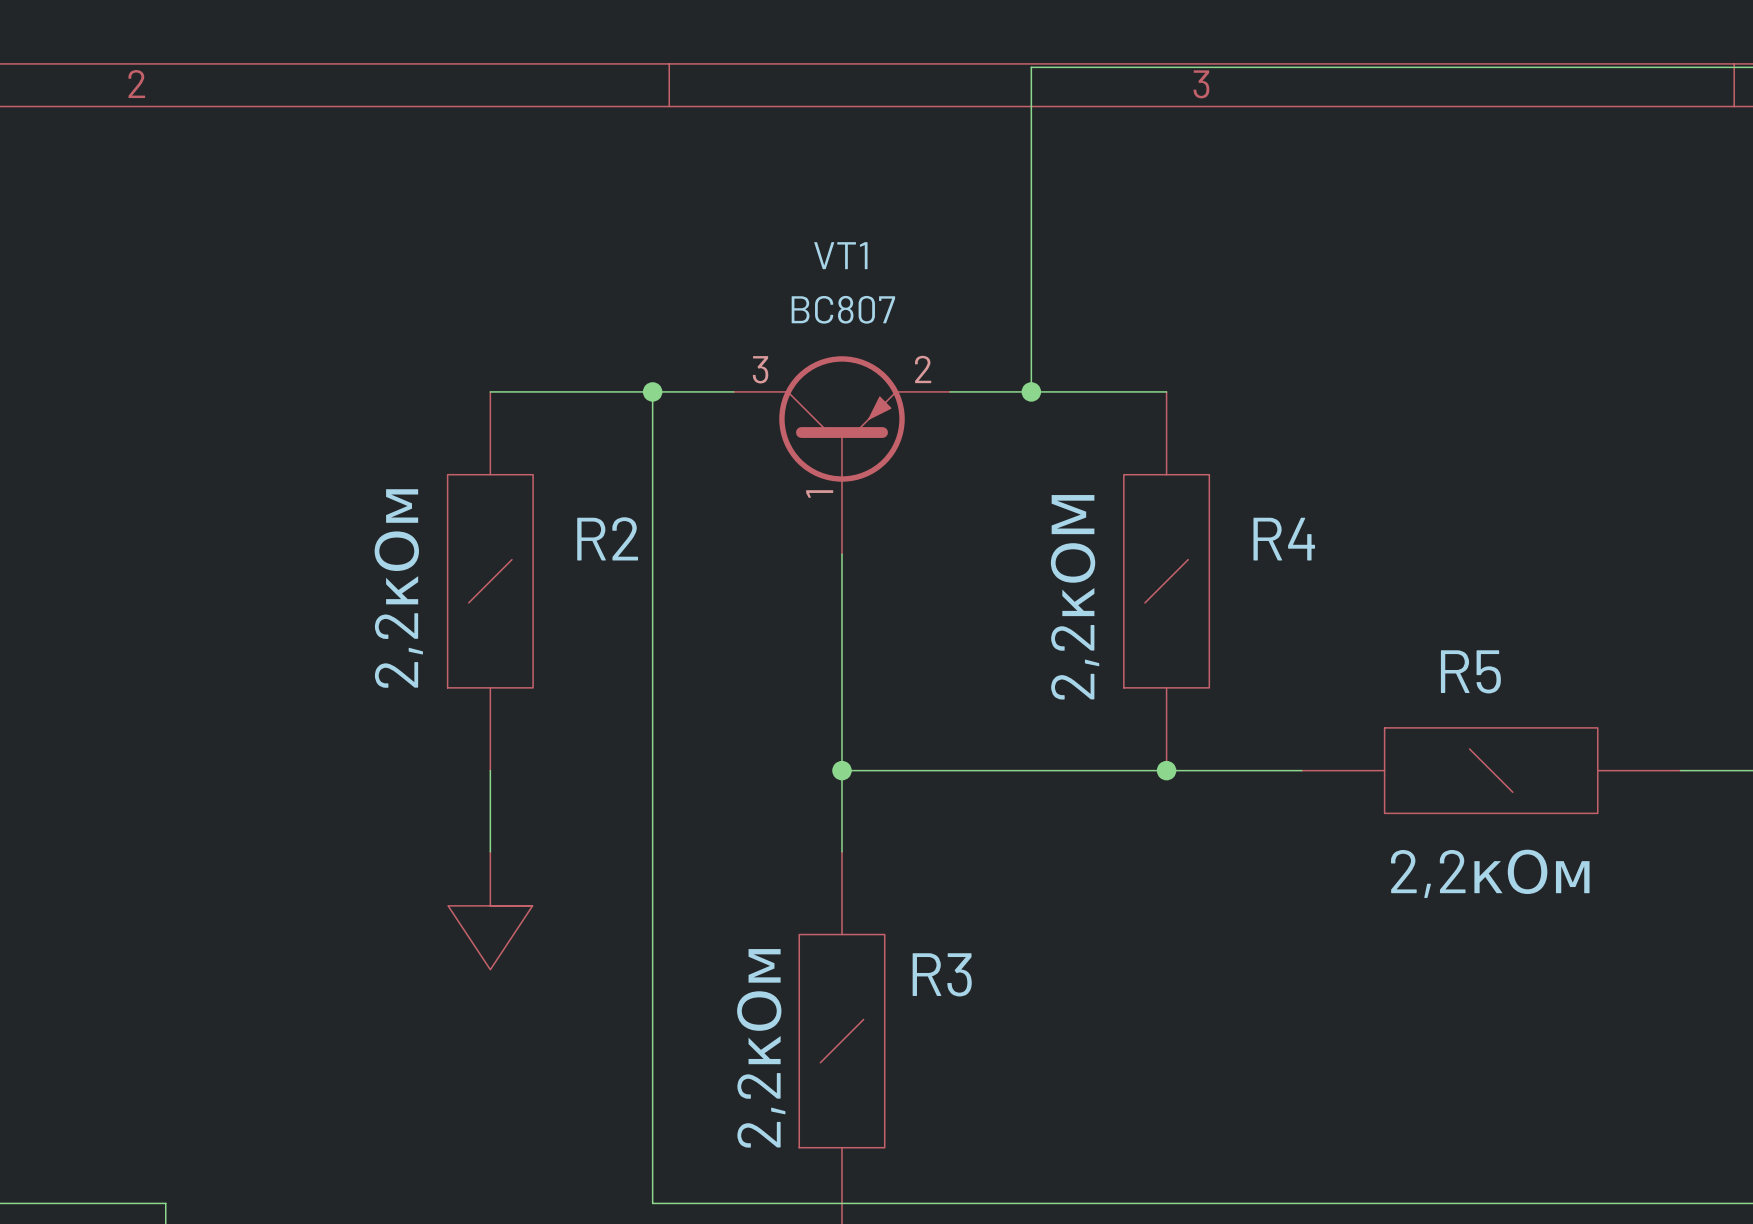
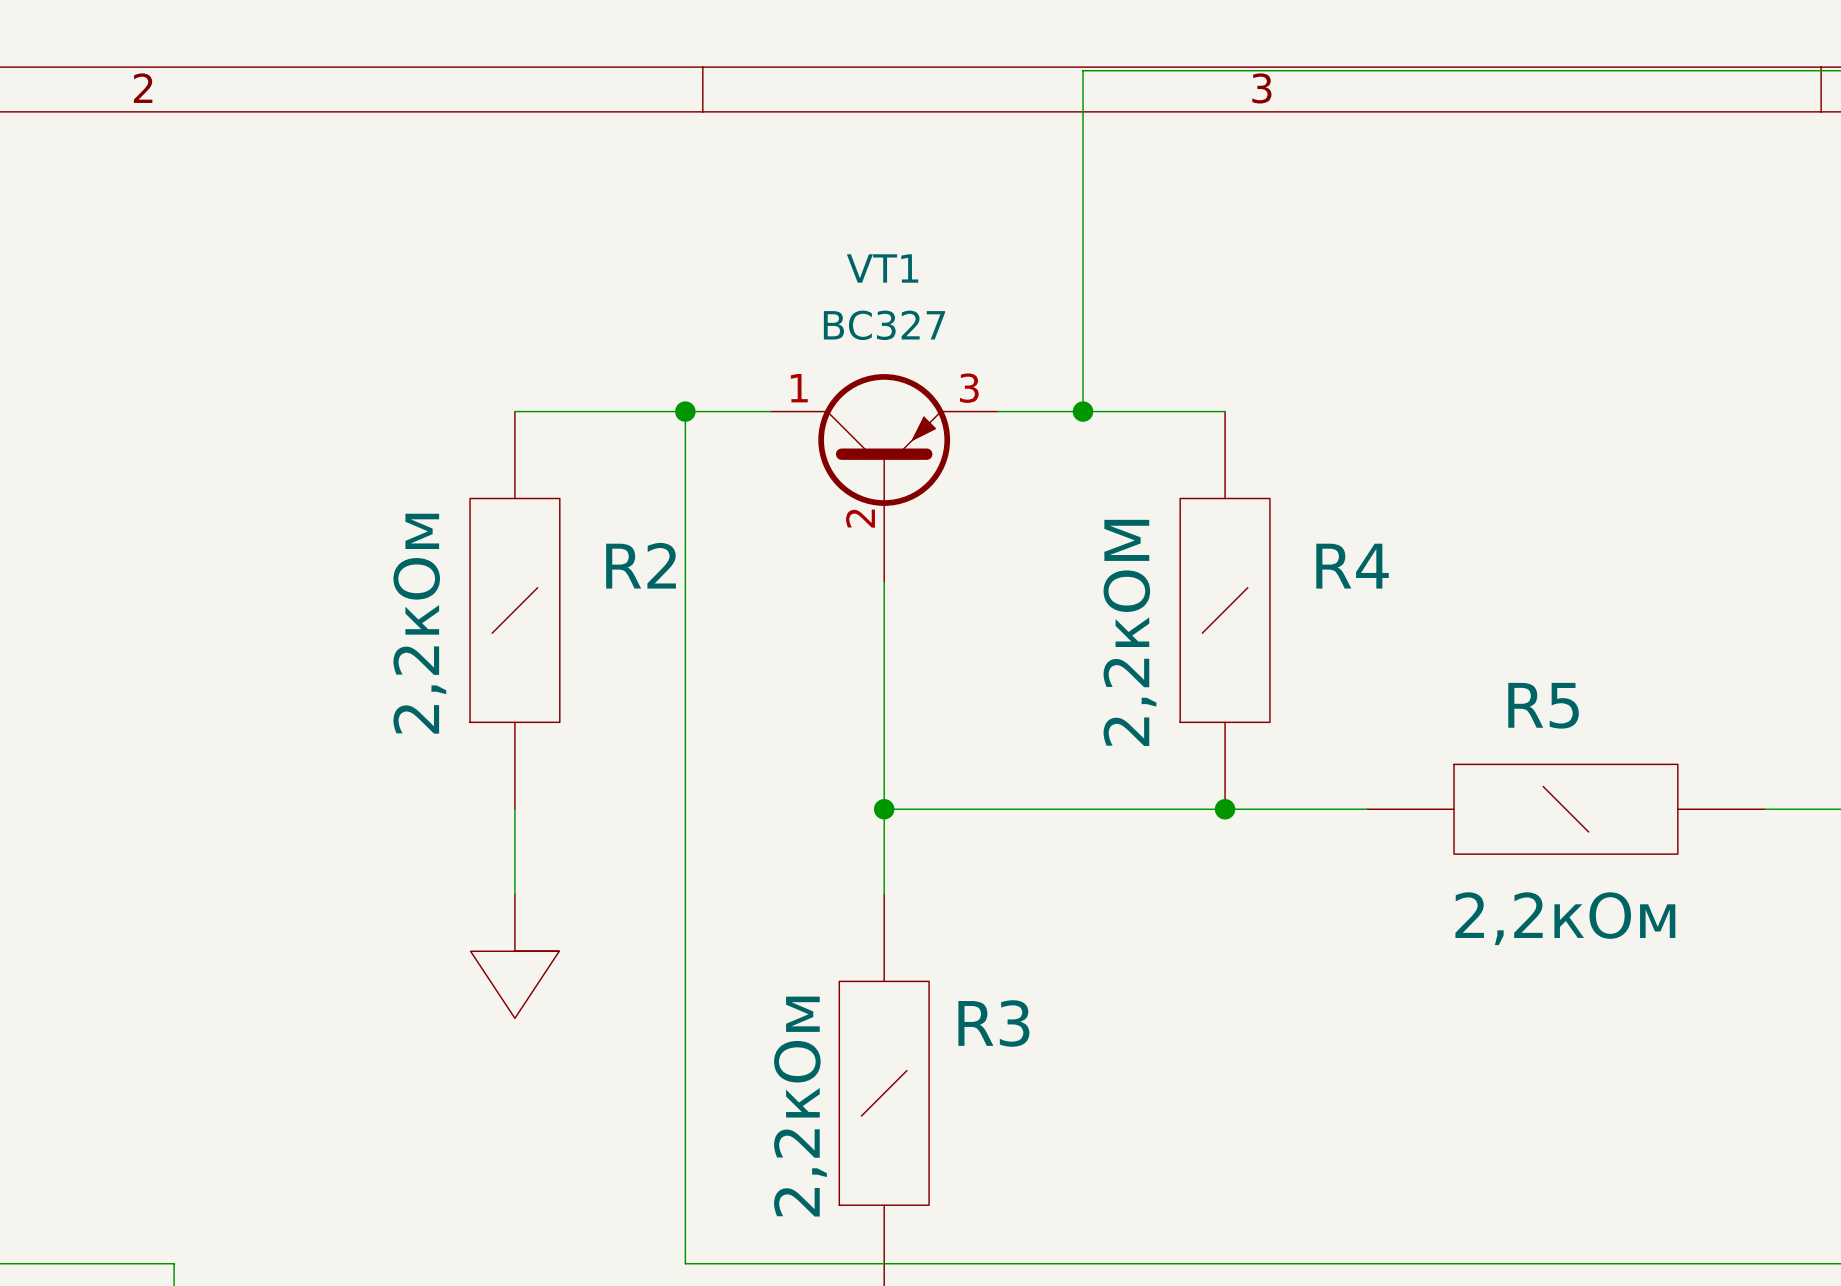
VT1 value: BC807 (843, 309) -> BC327 (884, 325)
VT1 pin number: 3 (760, 369) -> 1 (799, 388)
VT1 pin number: 2 (923, 369) -> 3 (969, 388)
VT1 pin number: 1 (819, 494) -> 2 (860, 518)

